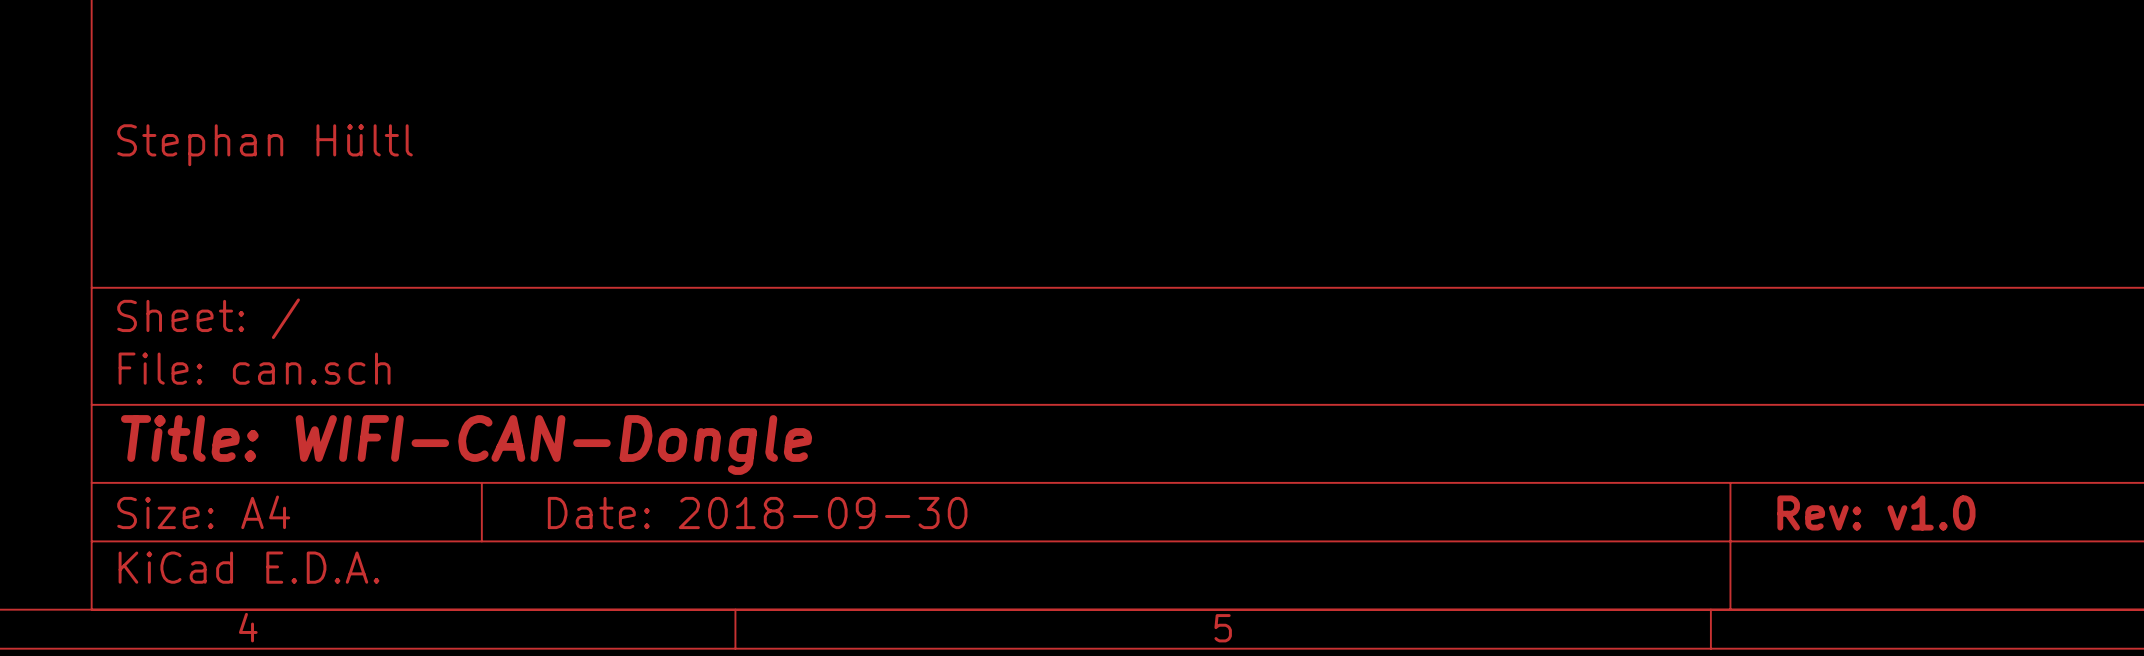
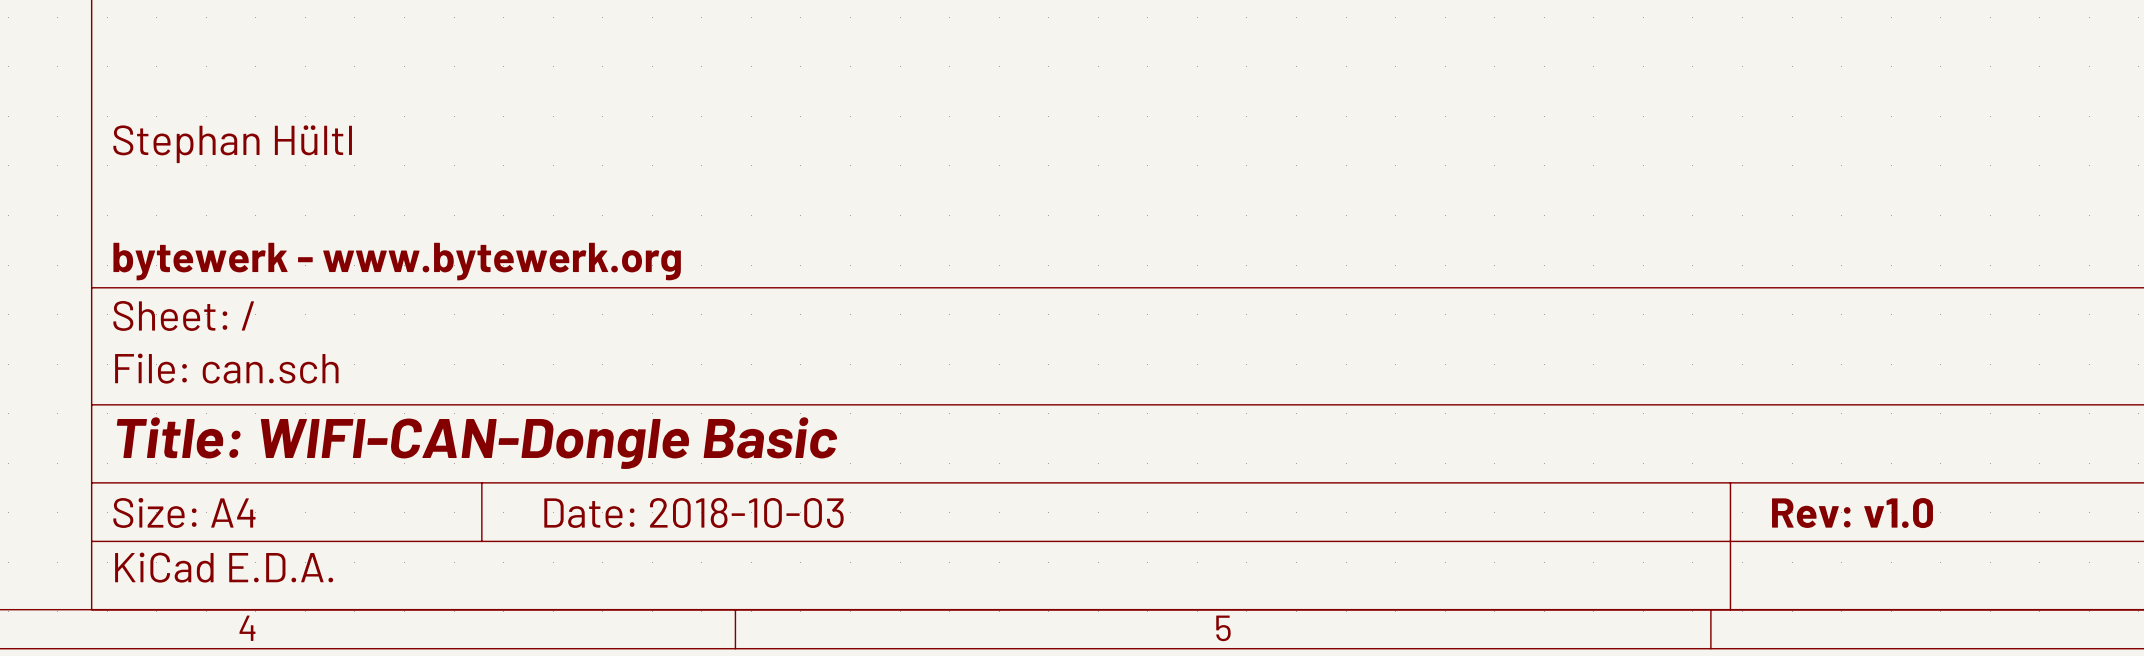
title block: none -> bytewerk - www.bytewerk.org (397, 261)
title block: Title: WIFI-CAN-Dongle (466, 444) -> Title: WIFI-CAN-Dongle Basic (476, 443)
title block: Date: 2018-09-30 (757, 512) -> Date: 2018-10-03 (693, 512)

